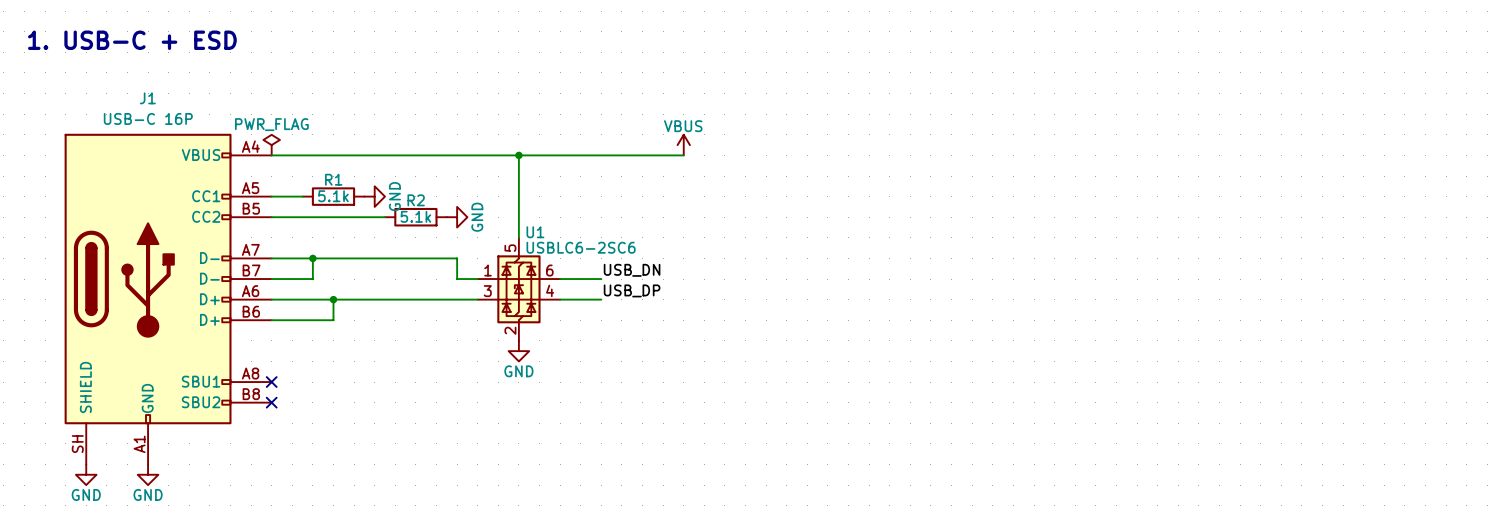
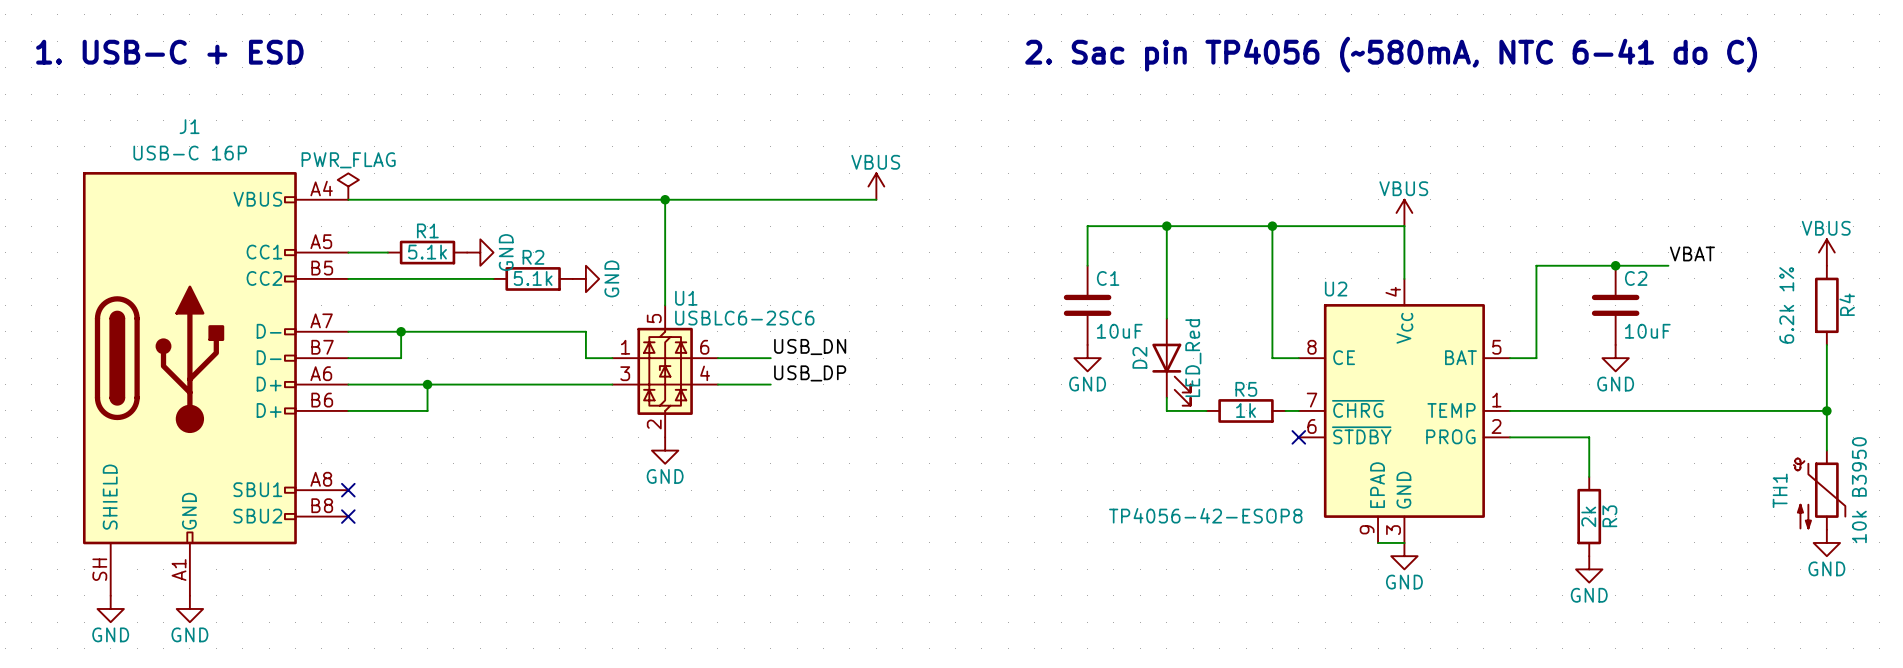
text: none -> 2. Sac pin TP4056 (~580mA, NTC 6-41 do C) (1391, 54)
power symbol: none -> VBUS (1404, 212)
wire: none -> (1166, 226) (1166, 318)
junction: none -> (1166, 226)
wire: none -> (1272, 226) (1272, 358) (1298, 358)
junction: none -> (1272, 226)
power symbol: none -> VBUS (1826, 252)
label: none -> VBAT (1692, 253)
wire: none -> (1087, 265) (1087, 226) (1404, 226) (1404, 278)
junction: none -> (1615, 265)
wire: none -> (1668, 265) (1536, 265) (1536, 358) (1510, 358)
C1: none -> 10uF (1087, 305)
C2: none -> 10uF (1615, 305)
R4: none -> 6.2k 1% (1826, 305)
wire: none -> (1826, 344) (1826, 450)
power symbol: none -> GND (1087, 358)
power symbol: none -> GND (1615, 358)
D2: none -> LED_Red (1171, 362)
wire: none -> (1166, 397) (1166, 410) (1206, 410)
R5: none -> 1k (1246, 410)
wire: none -> (1285, 410) (1298, 410)
U2: none -> TP4056-42-ESOP8 (1404, 410)
wire: none -> (1510, 410) (1826, 410)
junction: none -> (1826, 410)
no-connect mark: none -> (1298, 437)
wire: none -> (1510, 437) (1589, 437) (1589, 476)
TH1: none -> 10k B3950 (1819, 490)
R3: none -> 2k (1589, 516)
wire: none -> (1378, 542) (1404, 542)
power symbol: none -> GND (1826, 542)
power symbol: none -> GND (1404, 556)
power symbol: none -> GND (1589, 569)

